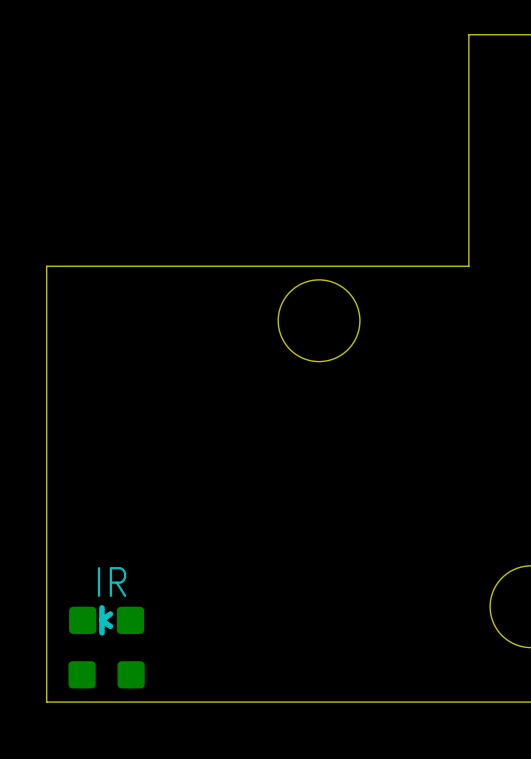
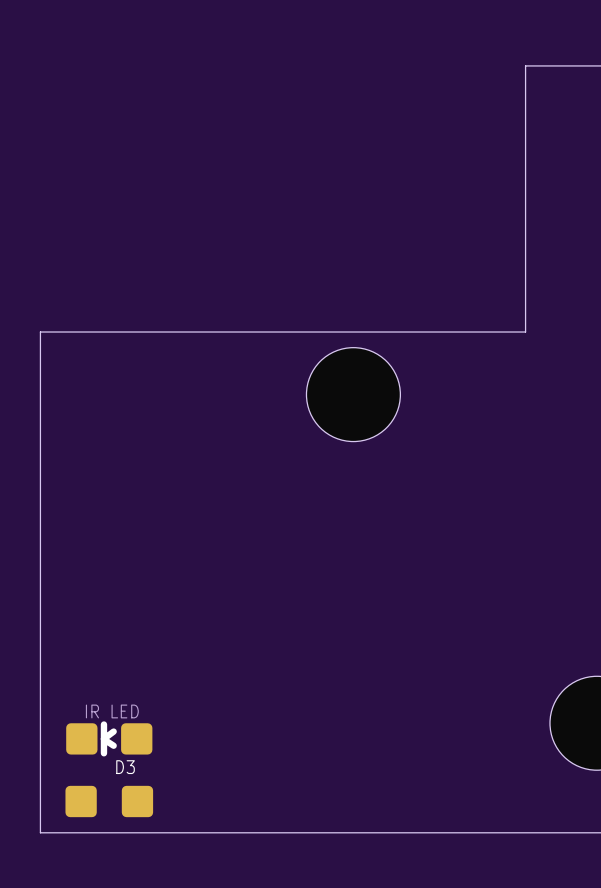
text: IR (112, 582) -> none
D3 value: none -> IR LED (112, 711)
D3 name: none -> D3 (125, 767)

